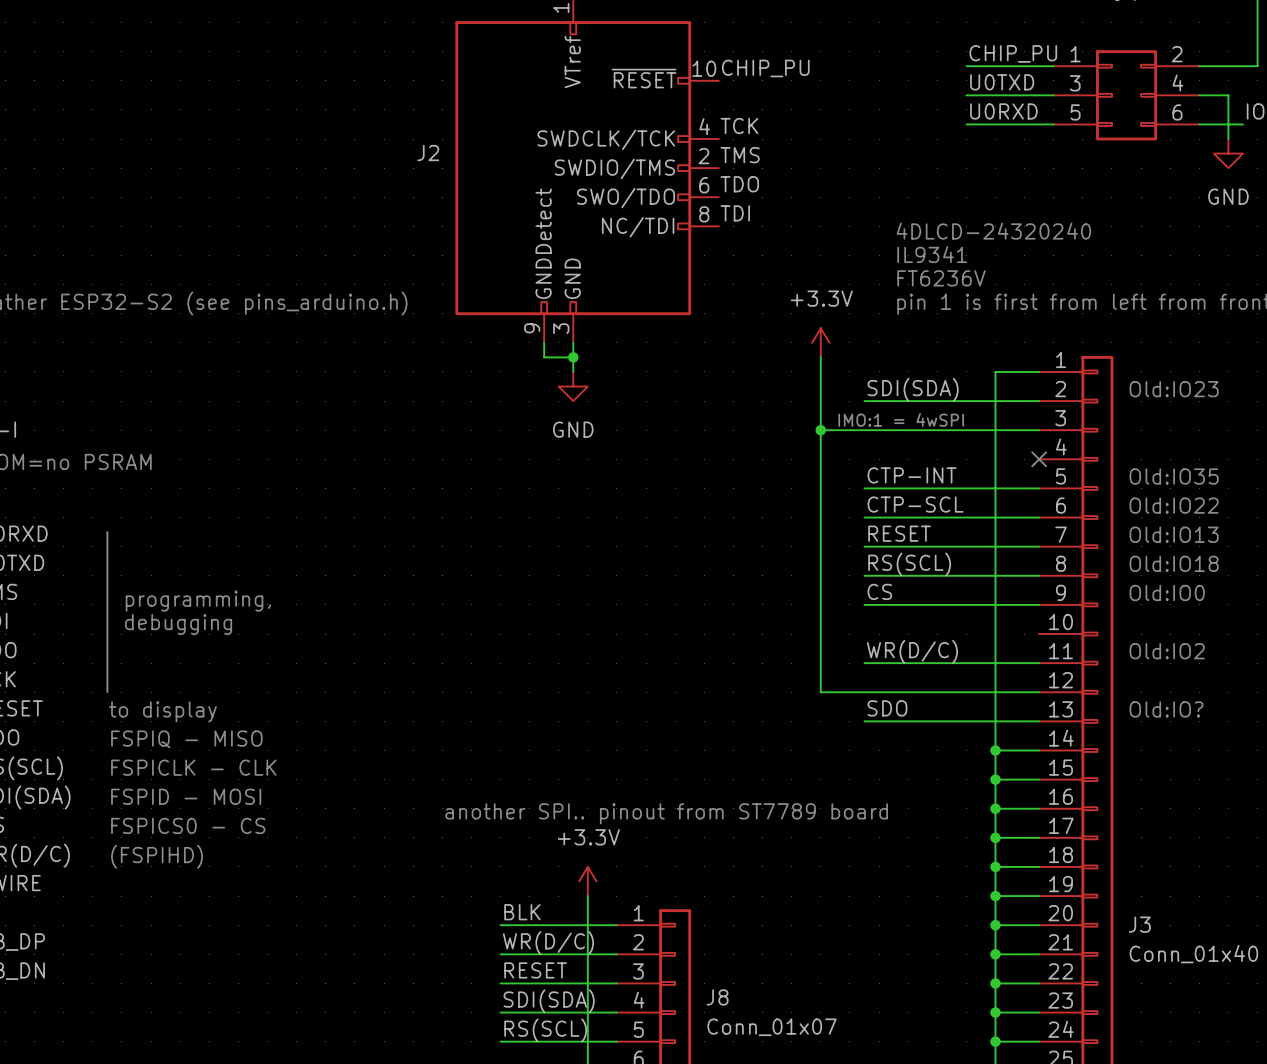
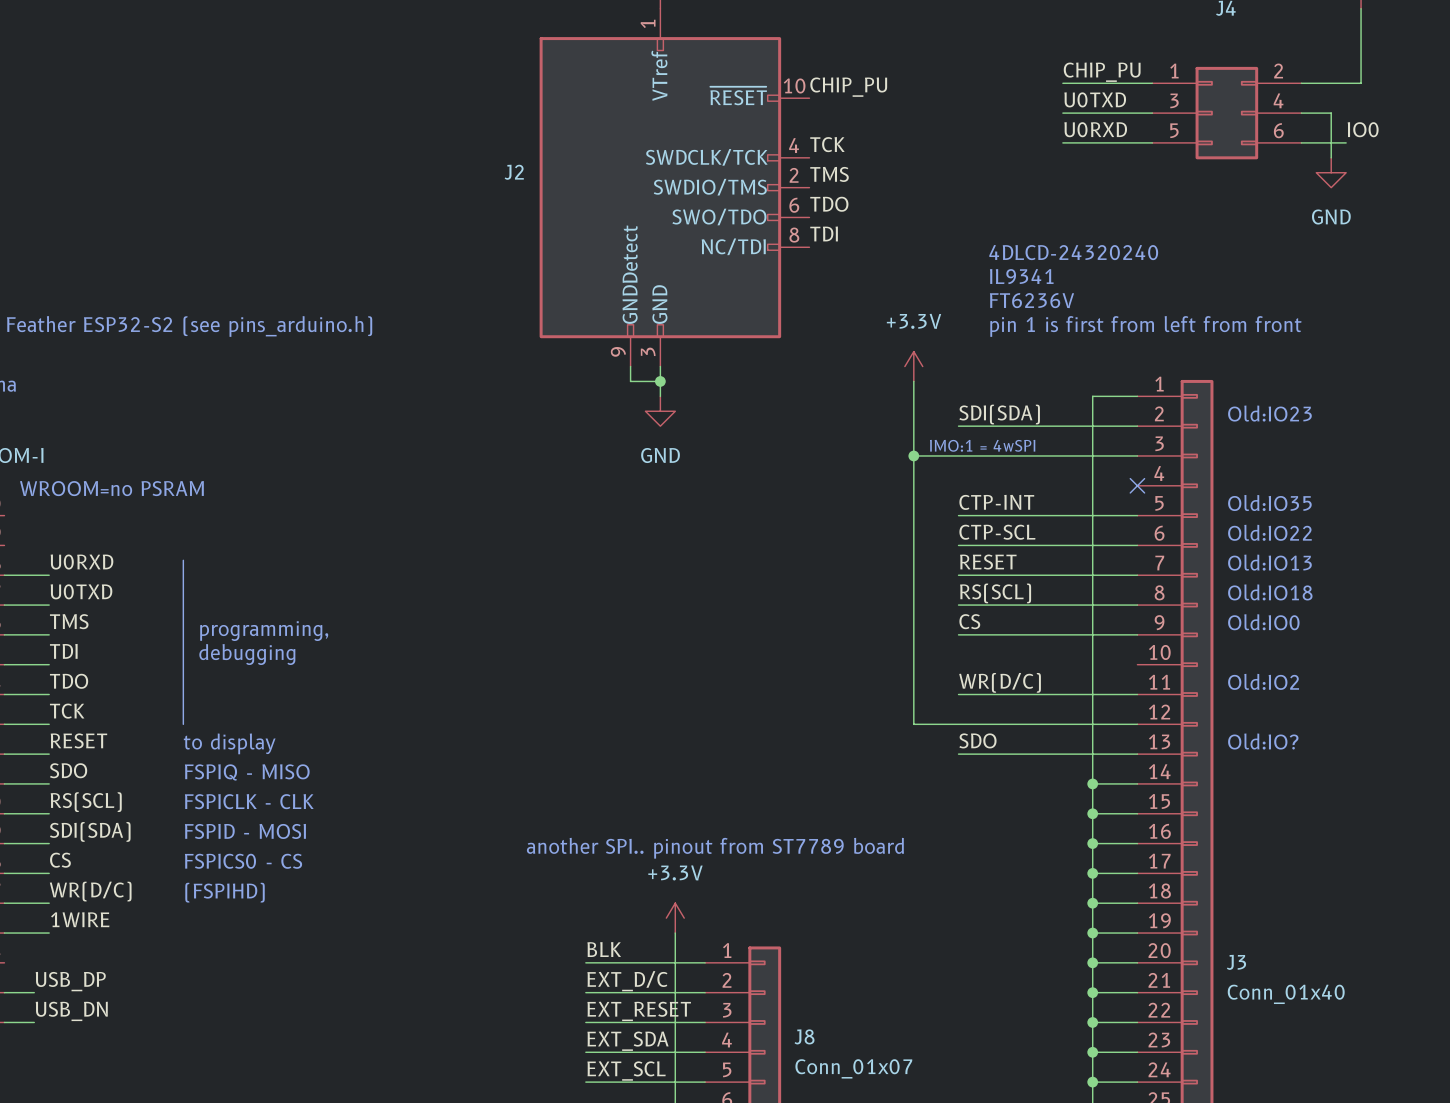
label: WR(D/C) (548, 943) -> EXT_D/C (627, 981)
label: RESET (535, 970) -> EXT_RESET (639, 1011)
label: SDI(SDA) (549, 1001) -> EXT_SDA (627, 1041)
label: RS(SCL) (545, 1030) -> EXT_SCL (626, 1071)

